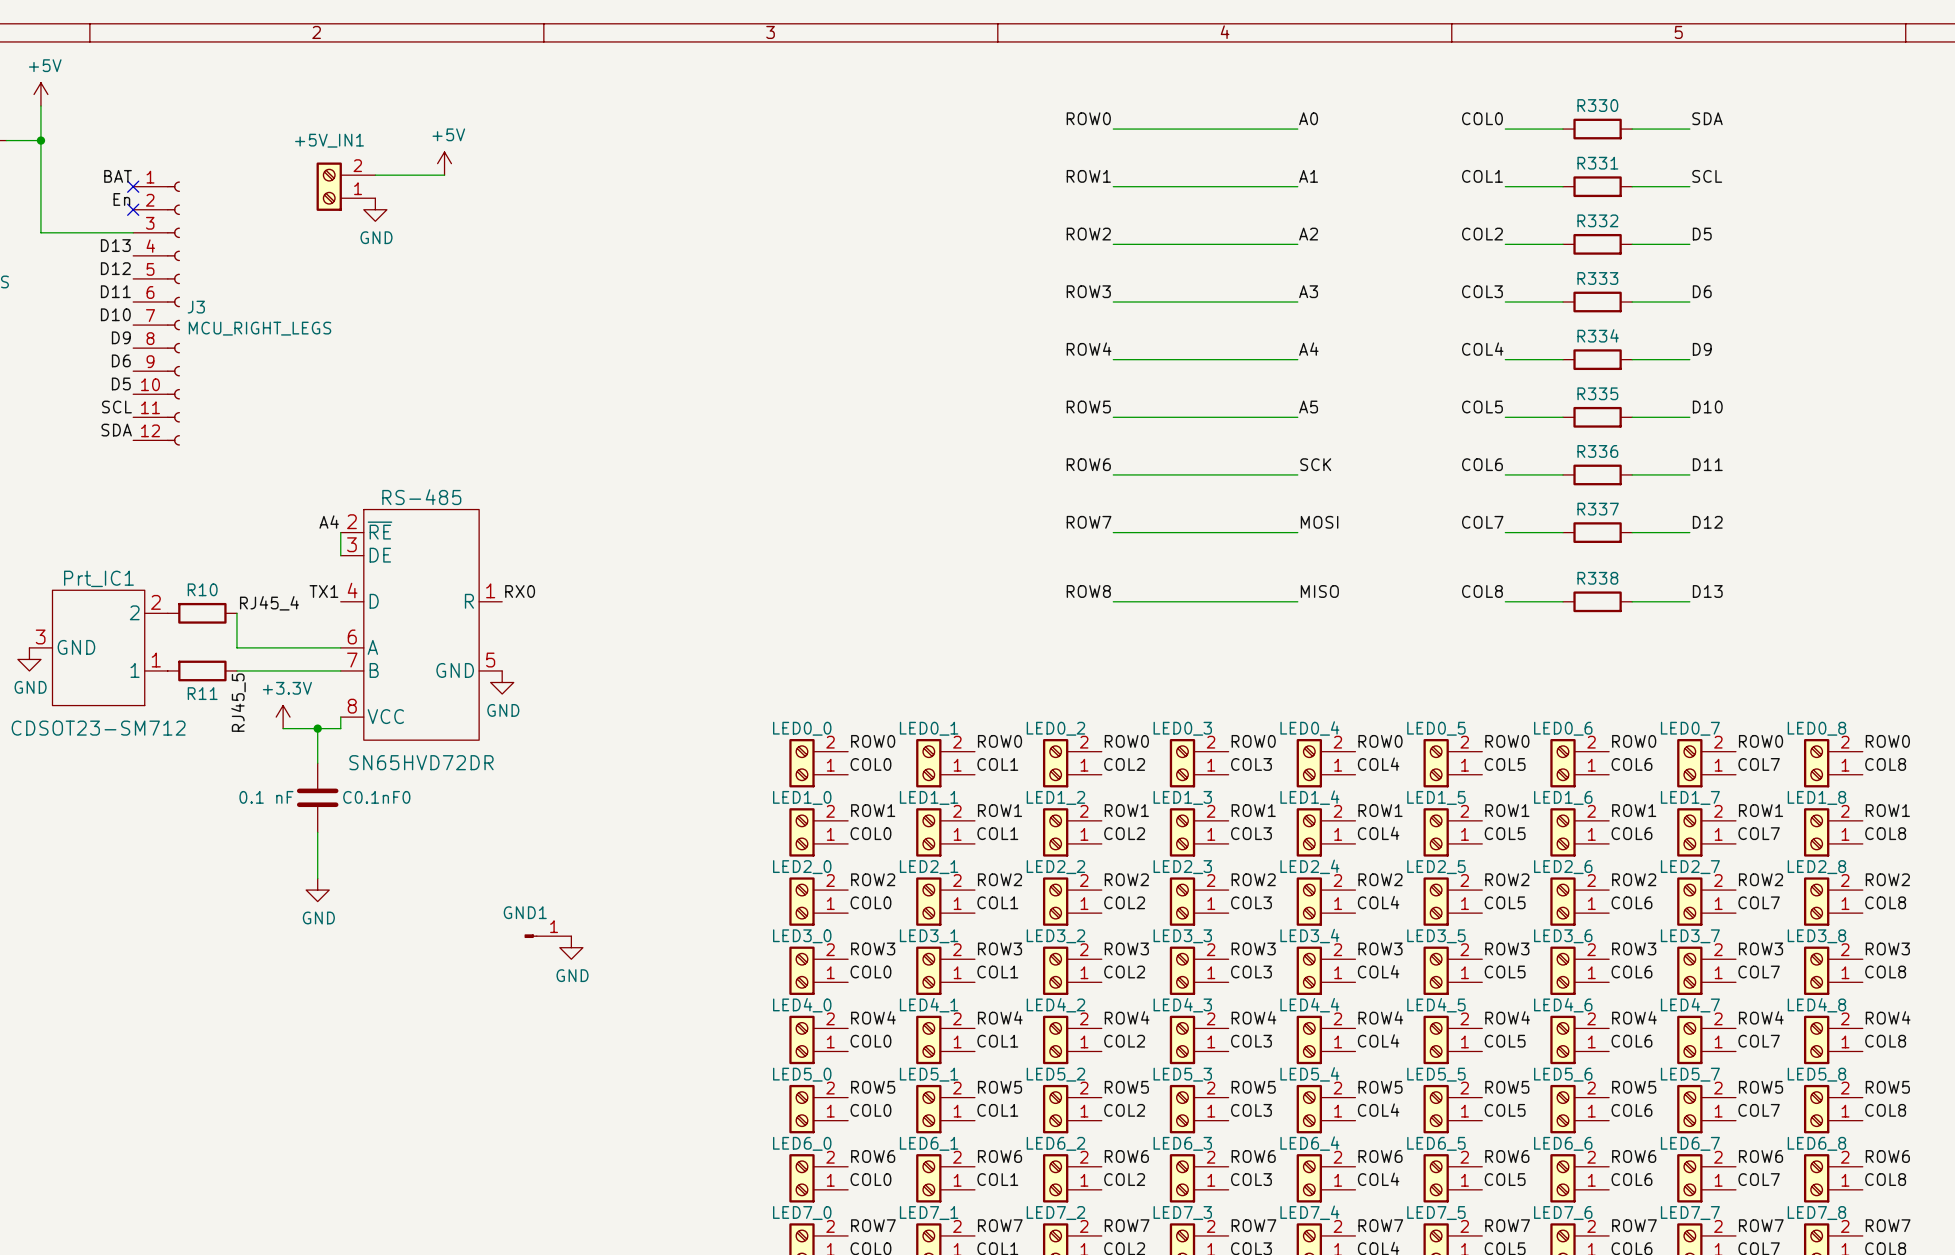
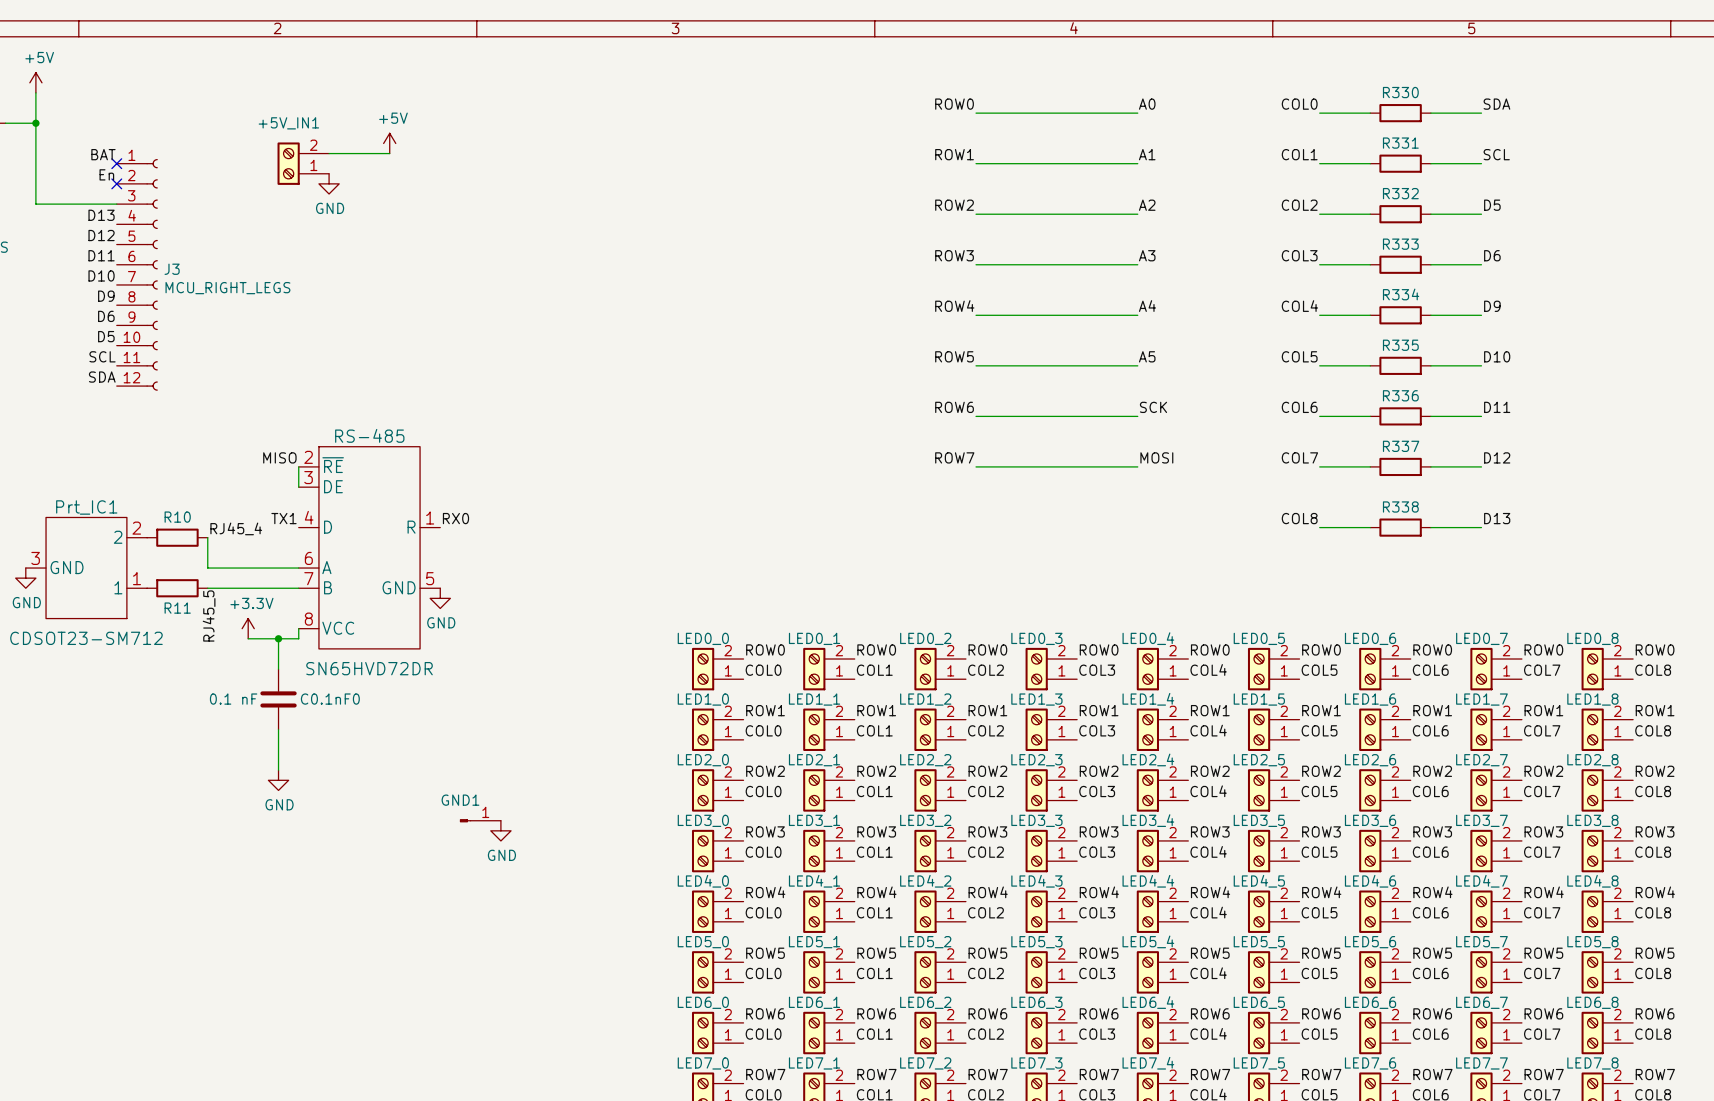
label: A4 (329, 522) -> MISO (279, 457)
label: ROW8 (1088, 591) -> none
label: MISO (1319, 591) -> none
wire: (1113, 601) (1297, 601) -> none

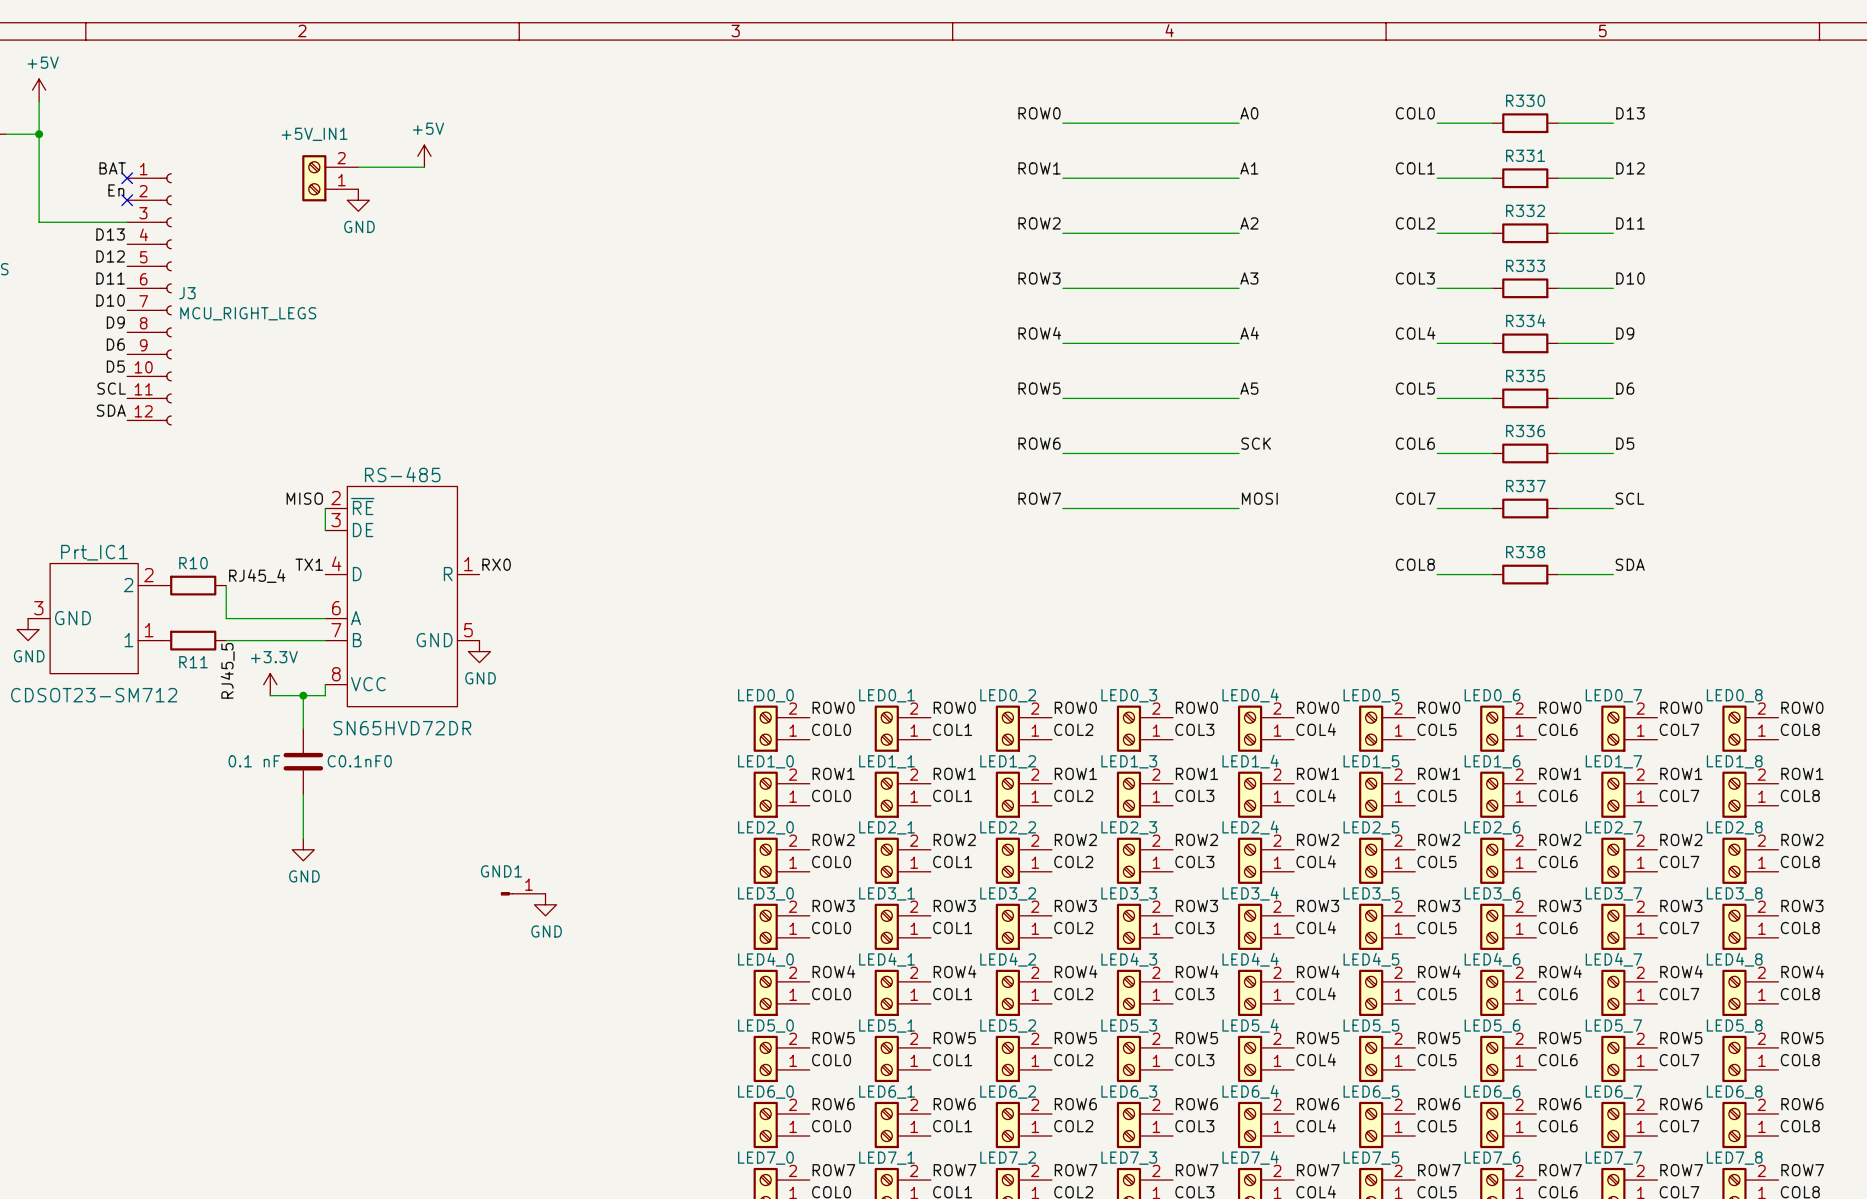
label: SDA (1496, 104) -> D13 (1630, 113)
label: SCL (1496, 154) -> D12 (1630, 168)
label: D5 (1492, 205) -> D11 (1630, 223)
label: D6 (1492, 255) -> D10 (1630, 278)
label: D10 (1497, 356) -> D6 (1625, 388)
label: D11 (1497, 407) -> D5 (1625, 443)
label: D12 (1497, 457) -> SCL (1629, 498)
label: D13 (1497, 518) -> SDA (1630, 564)

